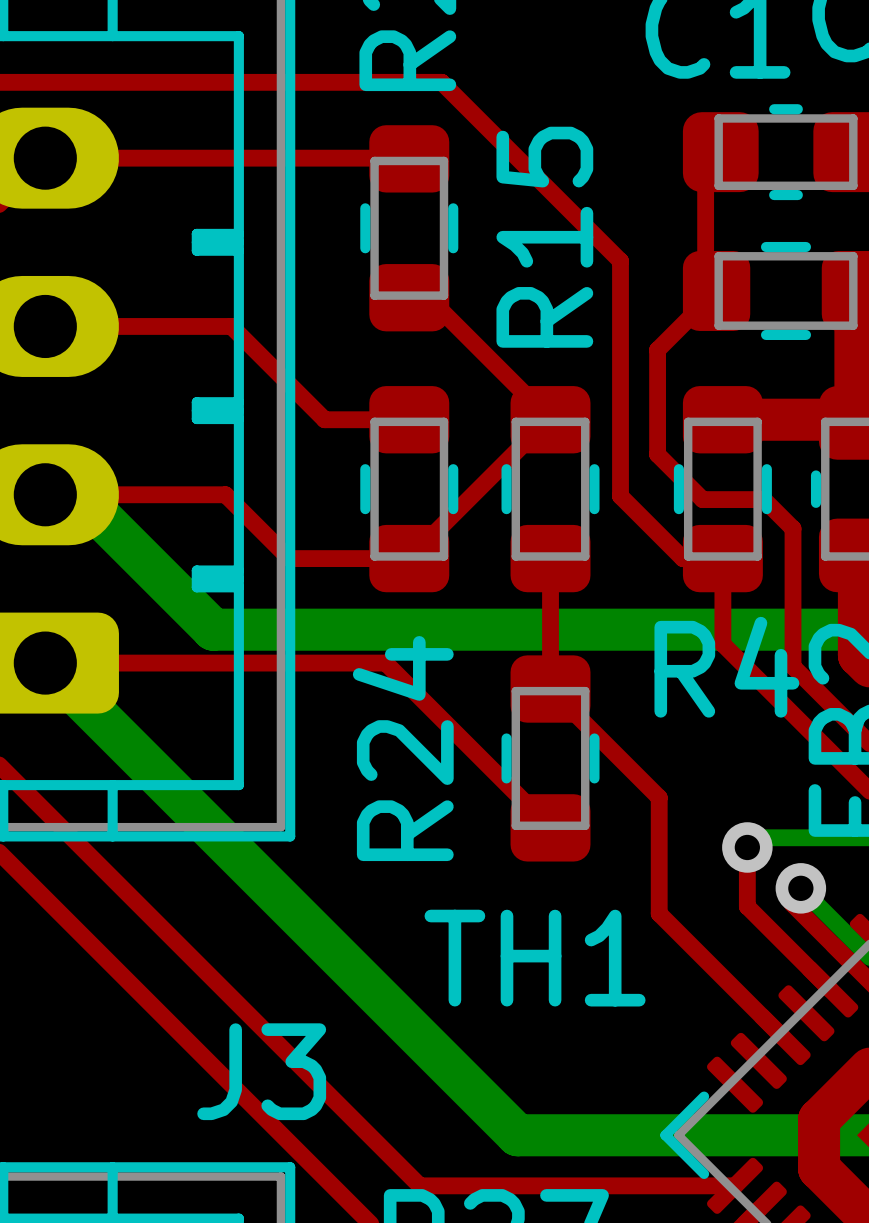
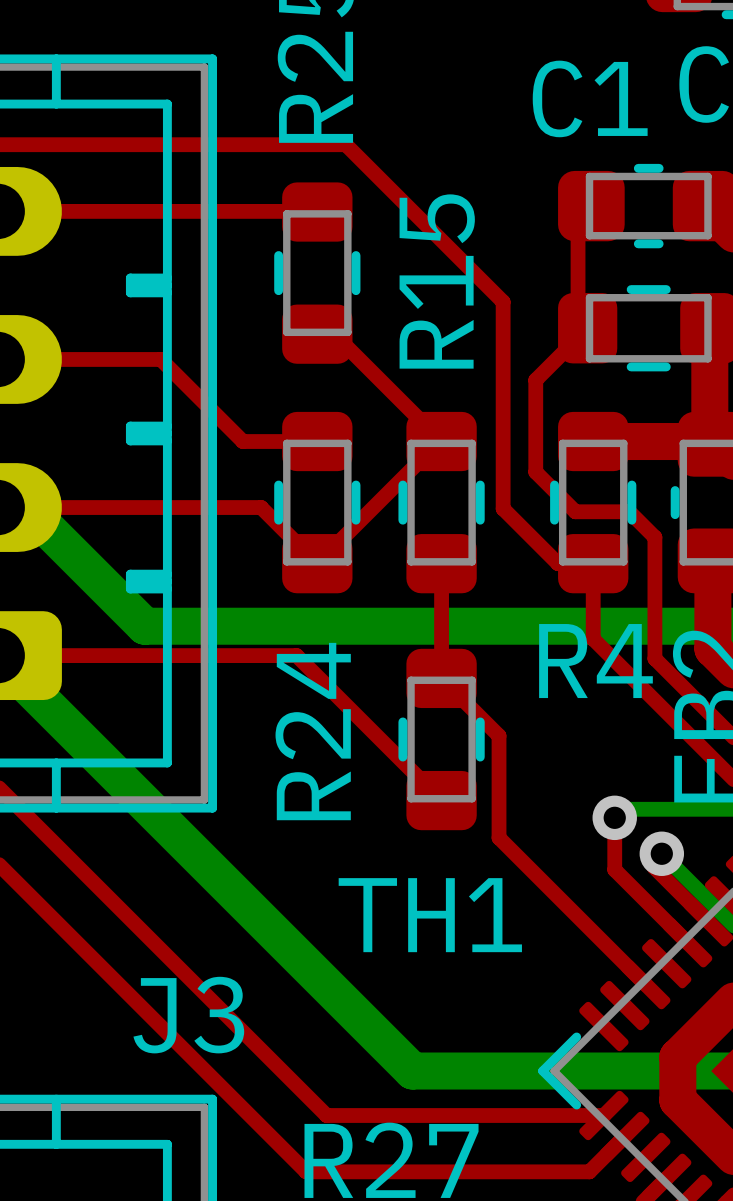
top track: (225, 494) (289, 558) (409, 558) -> (155, 507) (261, 507) (317, 563)
top track: (615, 754) (659, 797) (659, 913) -> (499, 735) (499, 837) (537, 876)

